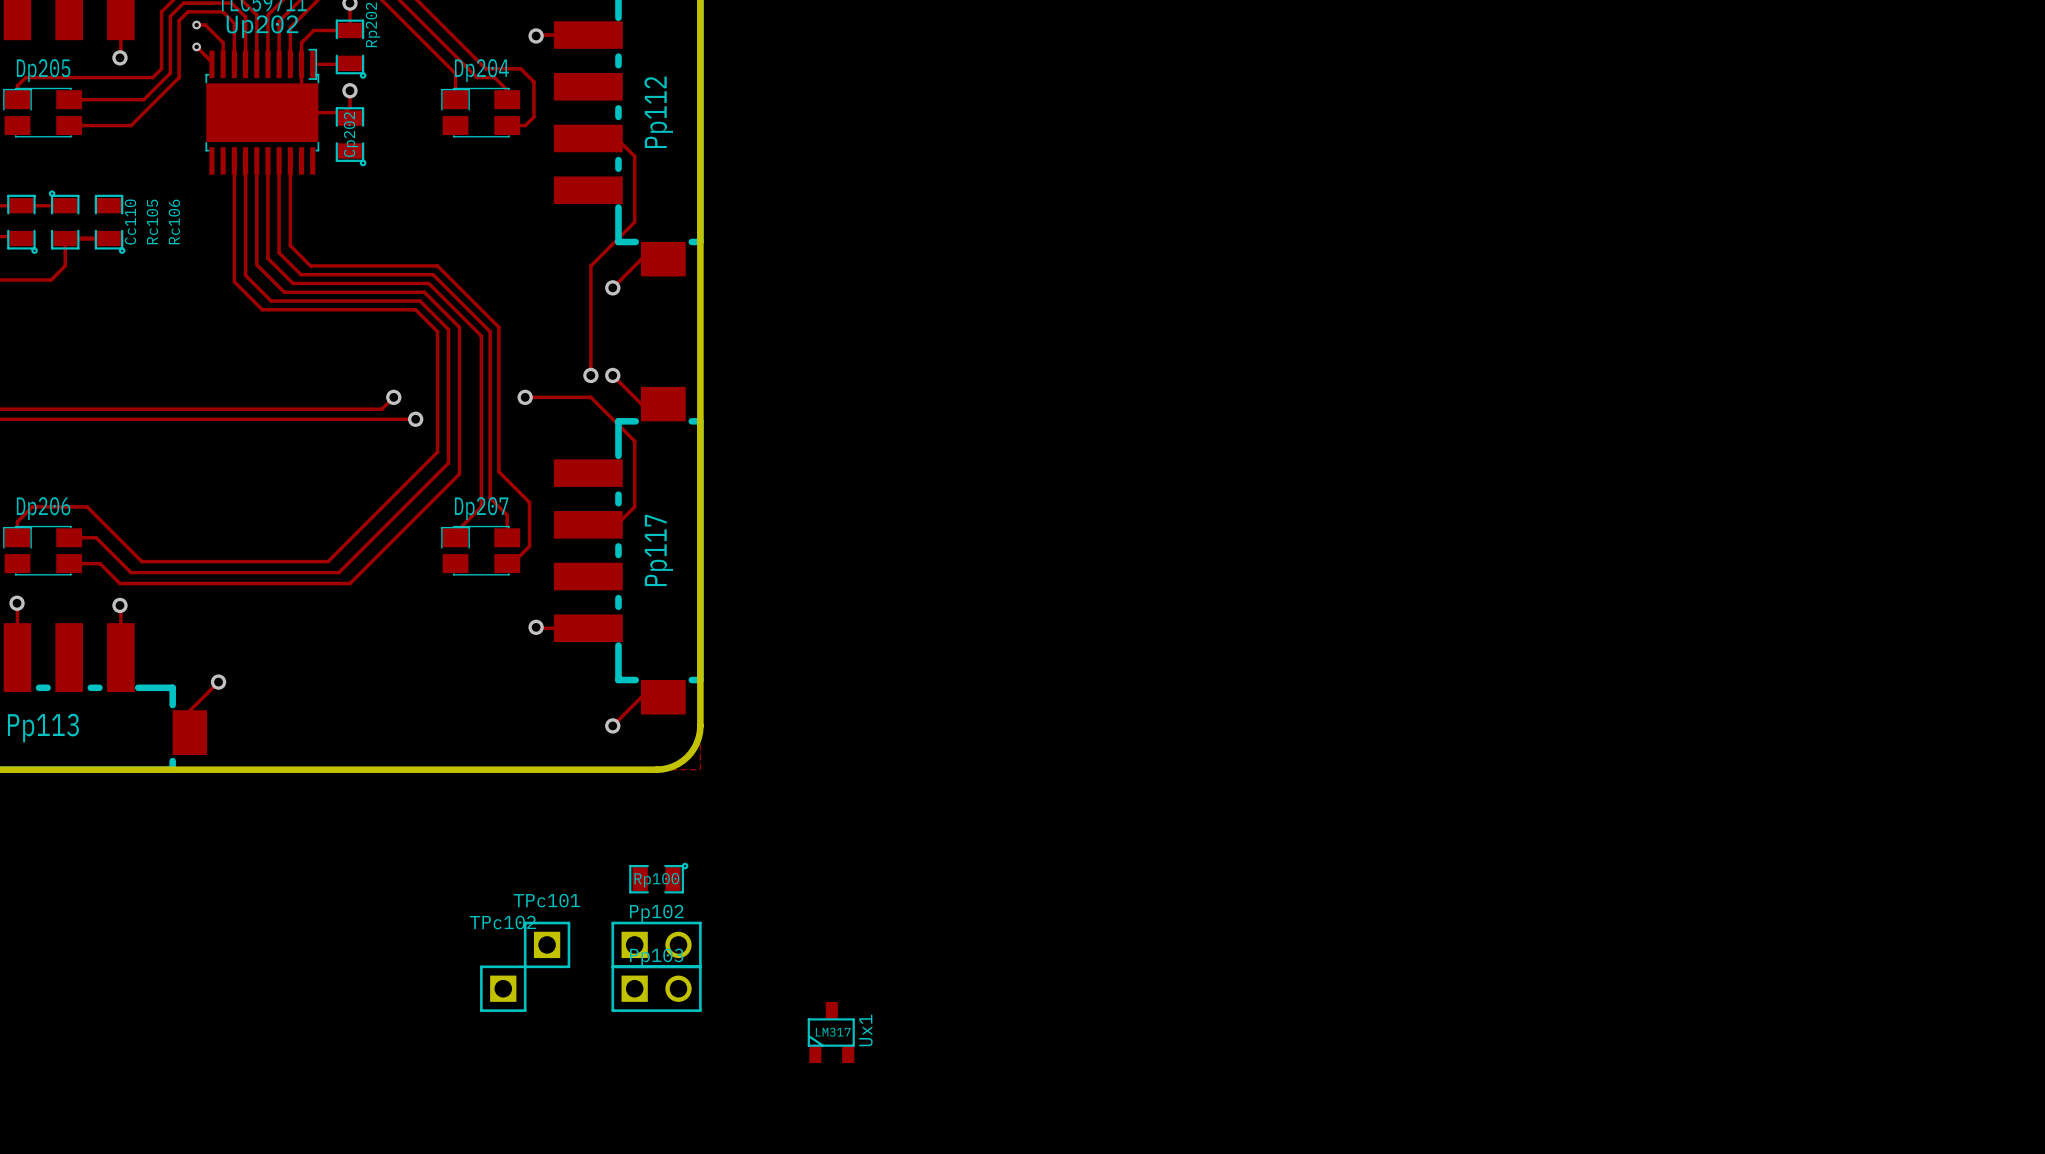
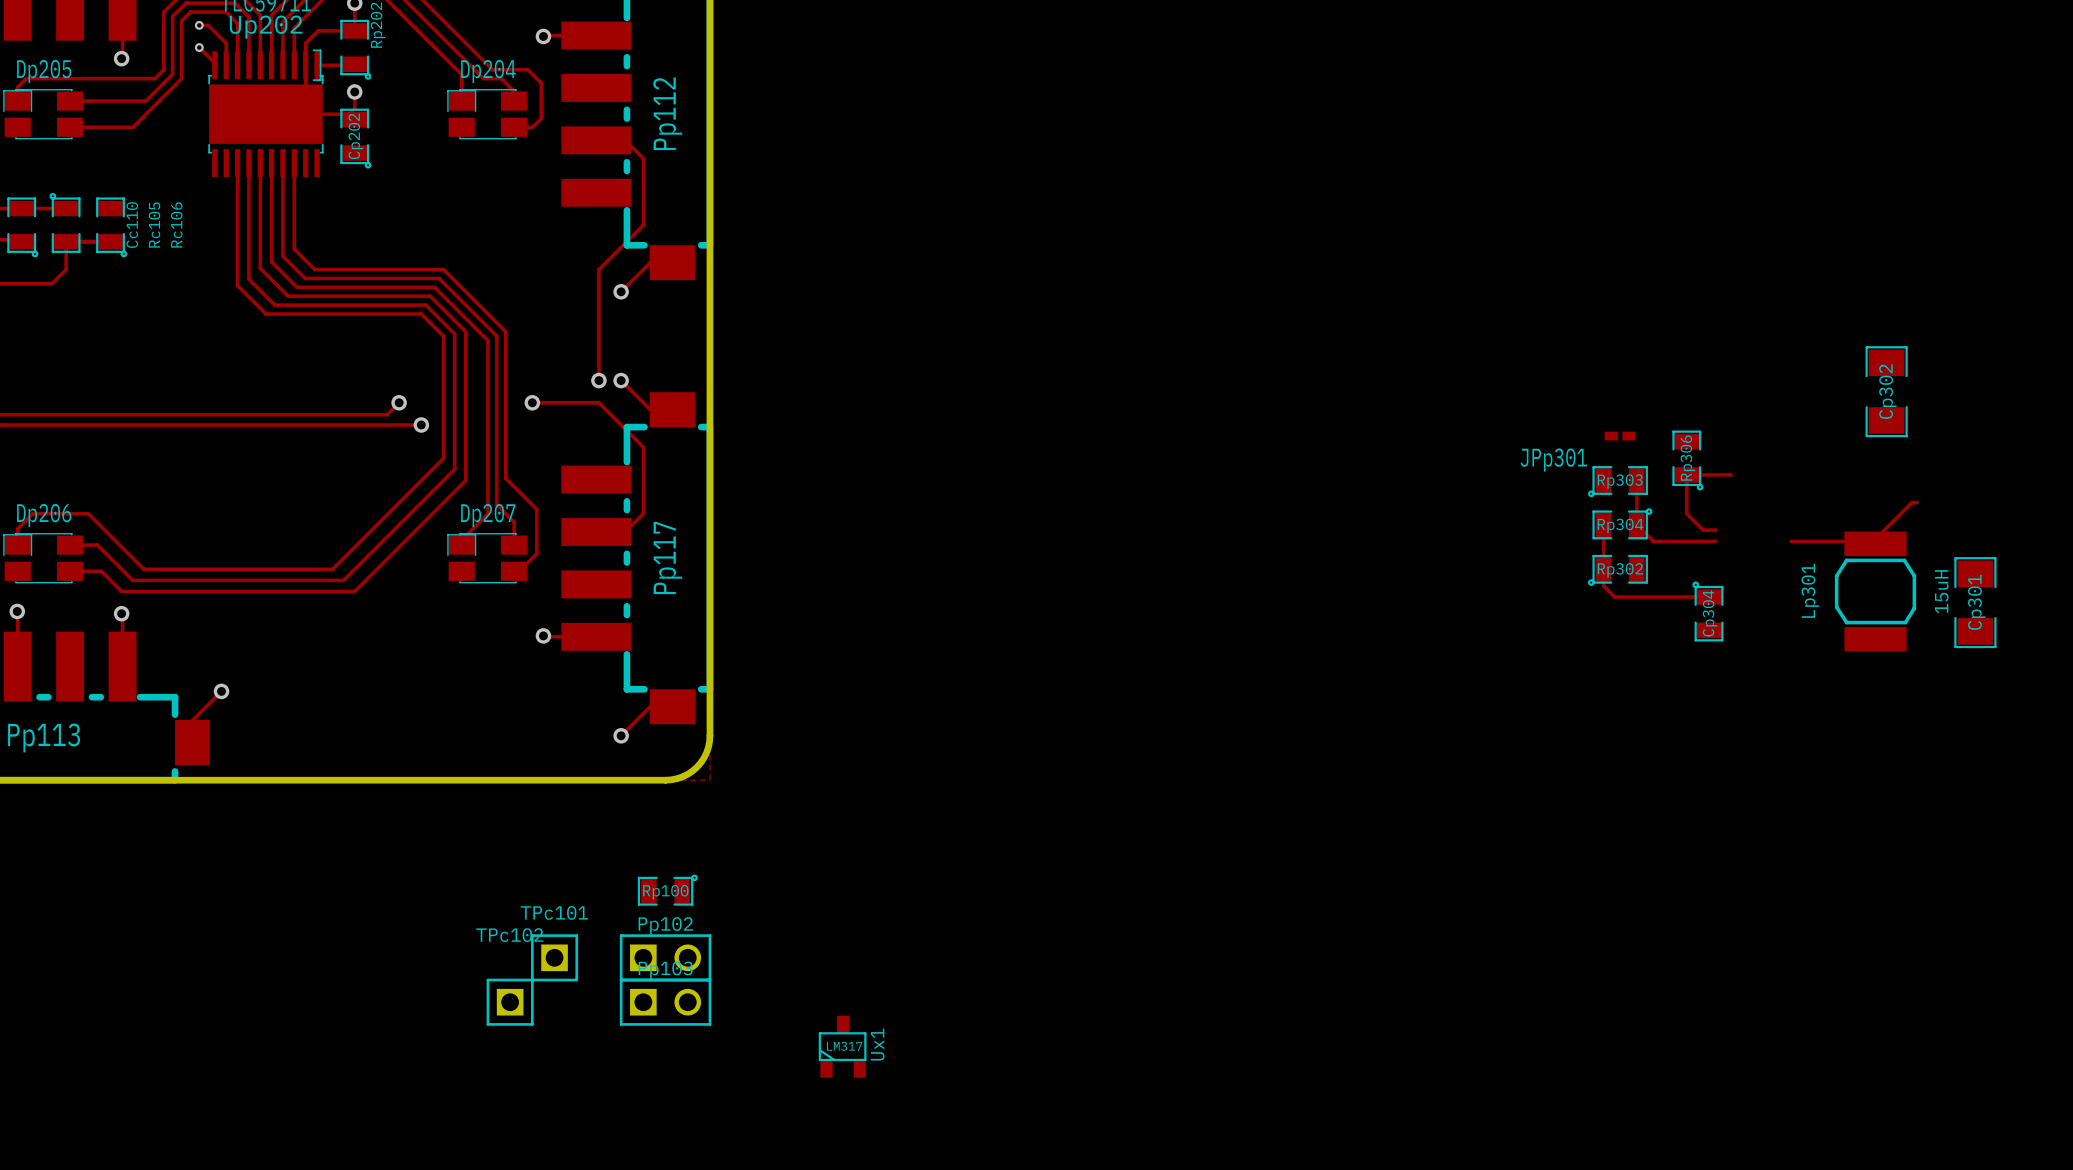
Cp302: none -> (1886, 391)
JPp301: none -> (1620, 436)
Rp306: none -> (1687, 460)
track: none -> (1731, 474) (1686, 474) (1686, 513) (1703, 530) (1715, 530)
track: none -> (1636, 480) (1636, 524) (1653, 541) (1715, 541)
Rp303: none -> (1617, 481)
track: none -> (1917, 502) (1911, 502) (1873, 541) (1790, 541)
Rp304: none -> (1622, 523)
track: none -> (1603, 524) (1603, 585) (1614, 597) (1709, 597)
Rp302: none -> (1617, 570)
Lp301: none -> 15uH (1875, 591)
Cp301: none -> (1975, 602)
Cp304: none -> (1707, 611)

